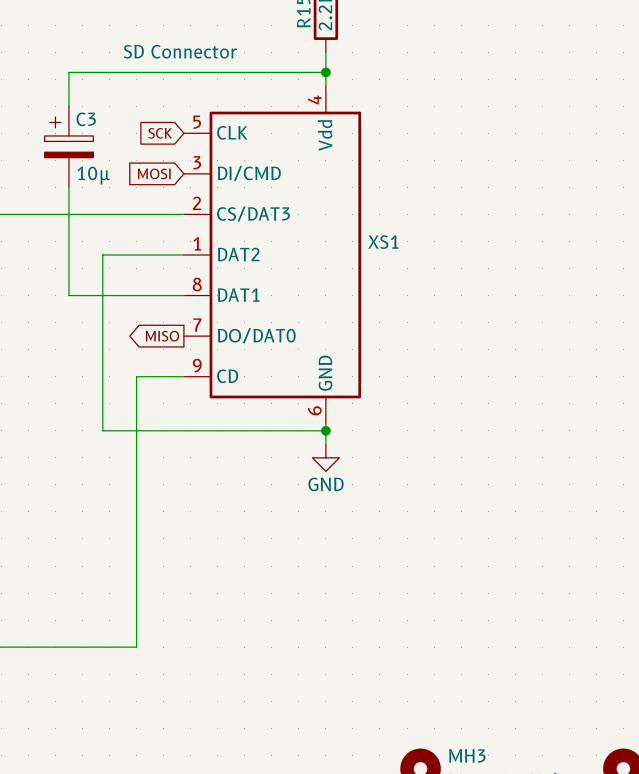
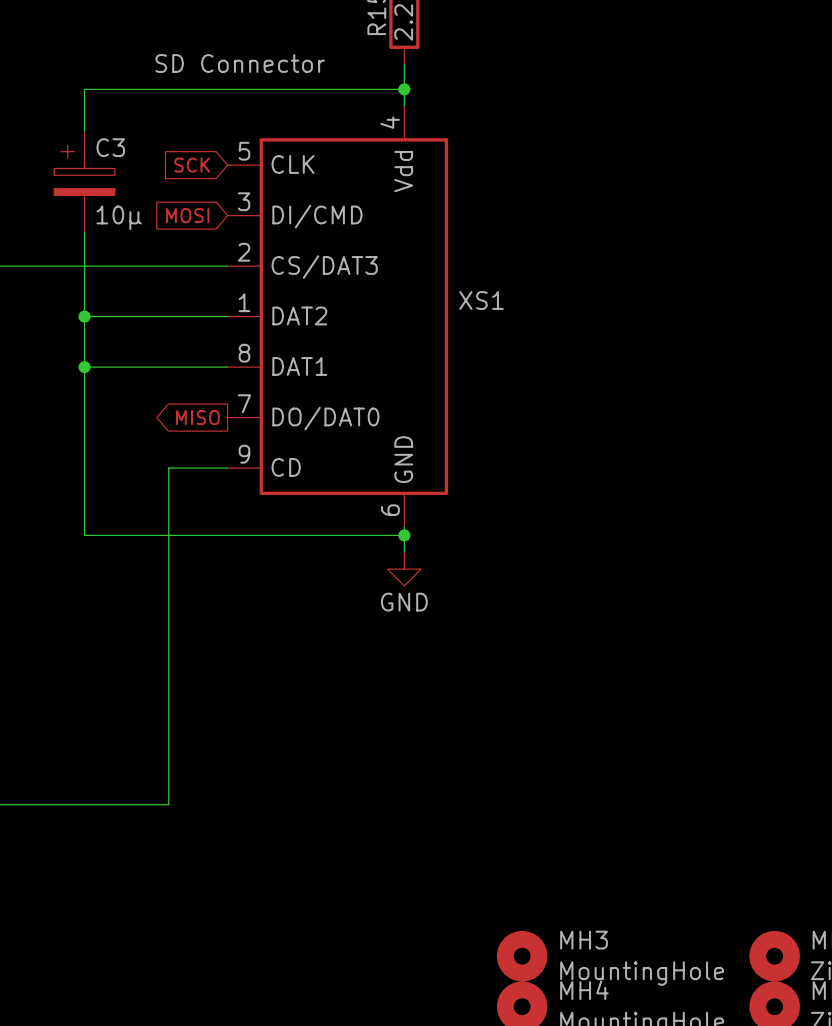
wire: none -> (84, 316) (126, 316)
junction: none -> (84, 316)
wire: (102, 254) (102, 430) -> (84, 367) (84, 535) (126, 535)
junction: none -> (84, 367)

